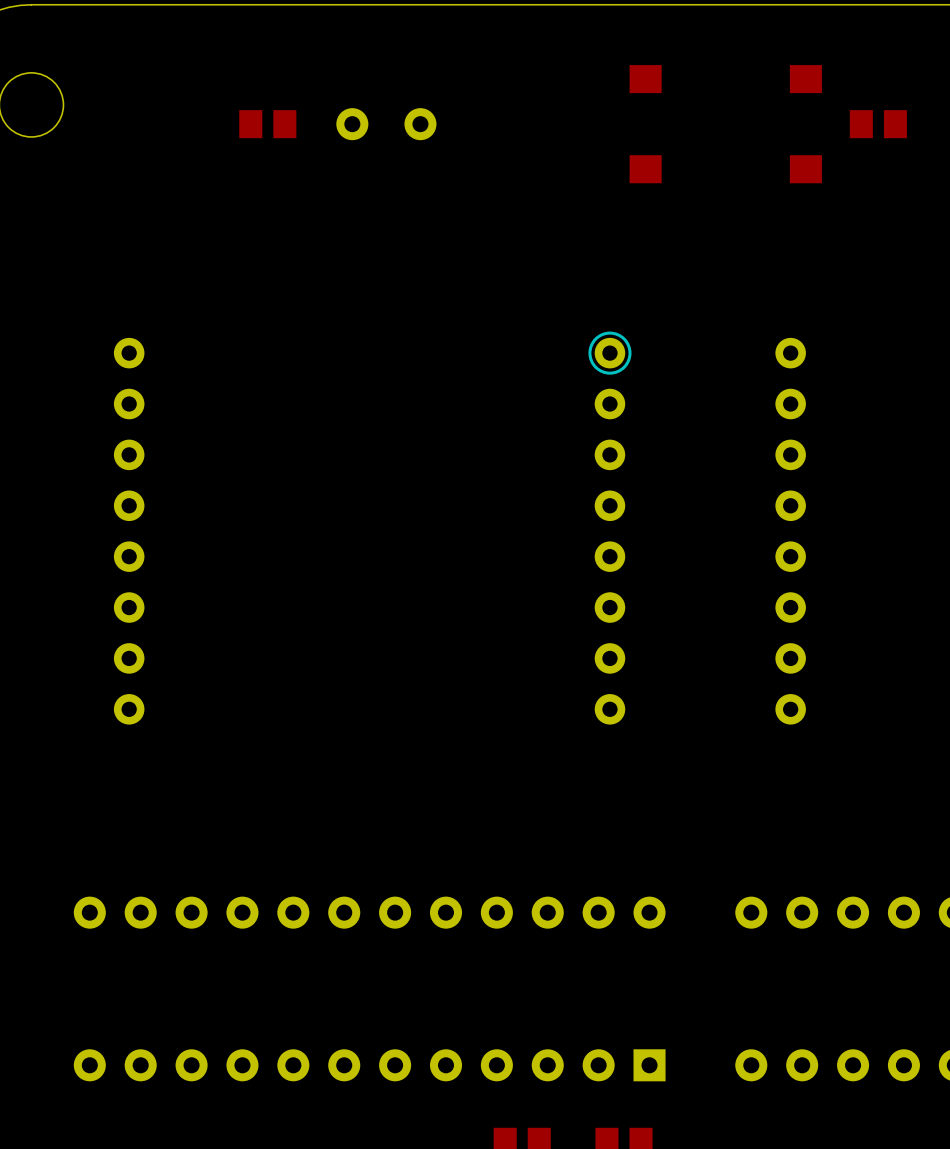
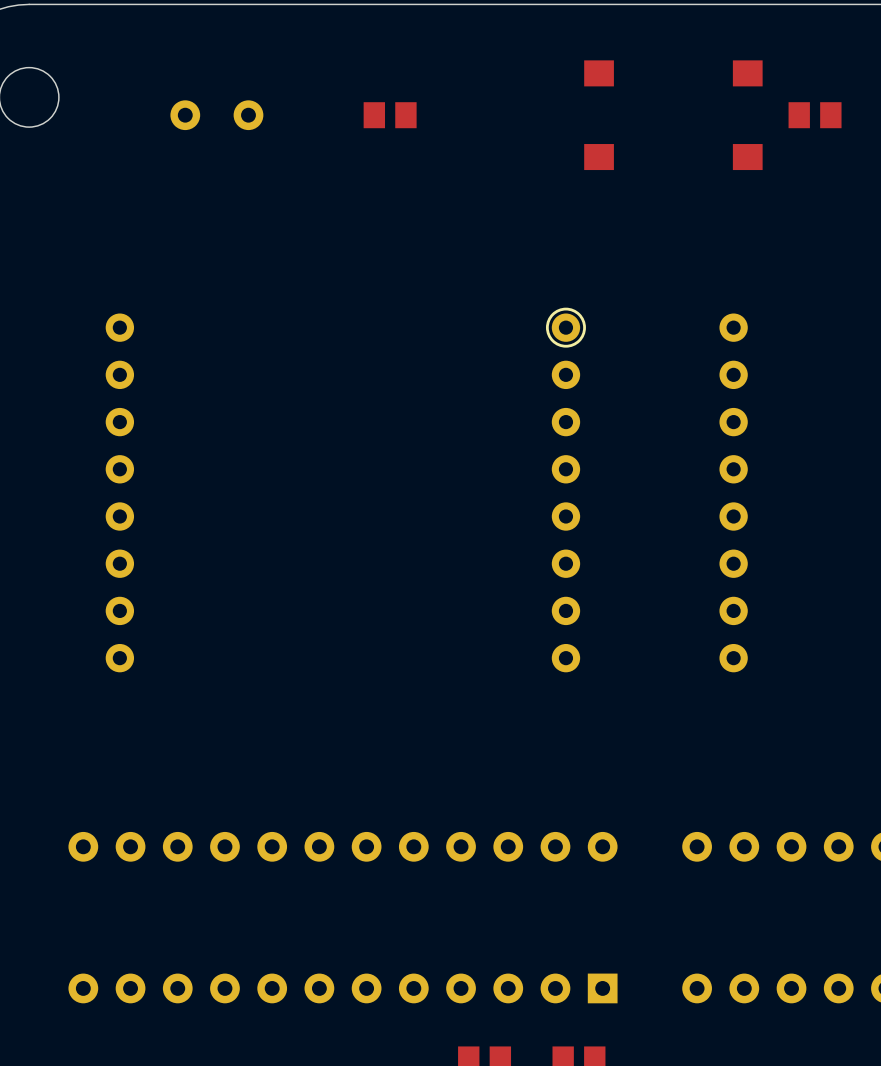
part position: (267, 124) -> (390, 115)
part position: (386, 124) -> (216, 115)

